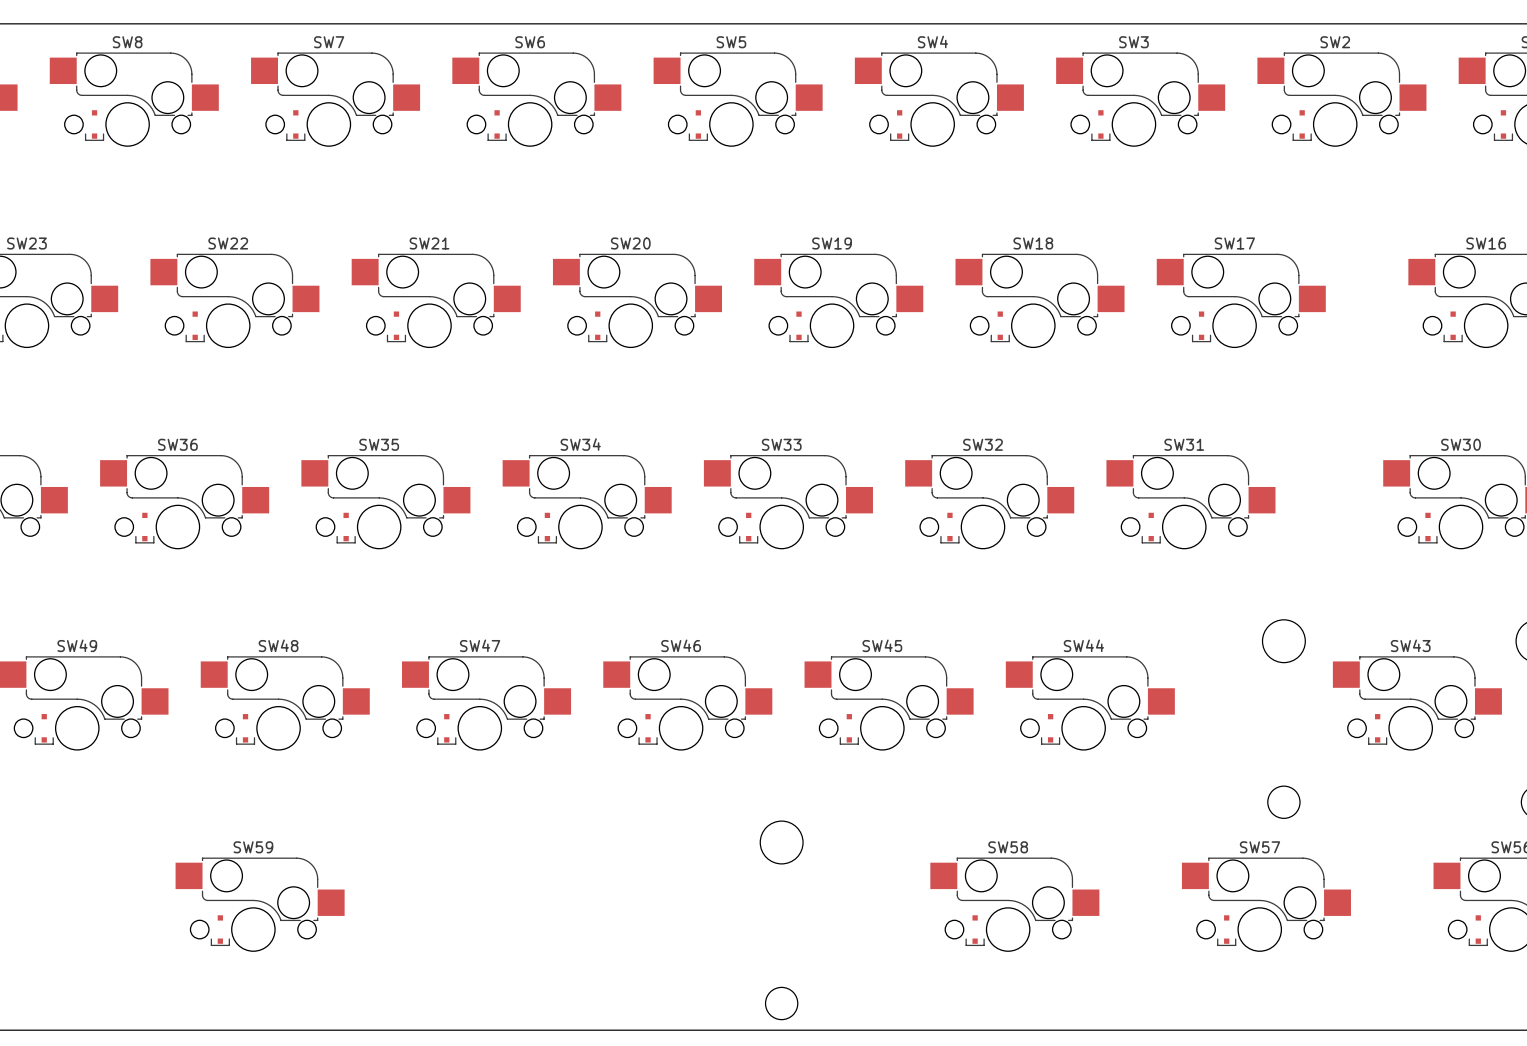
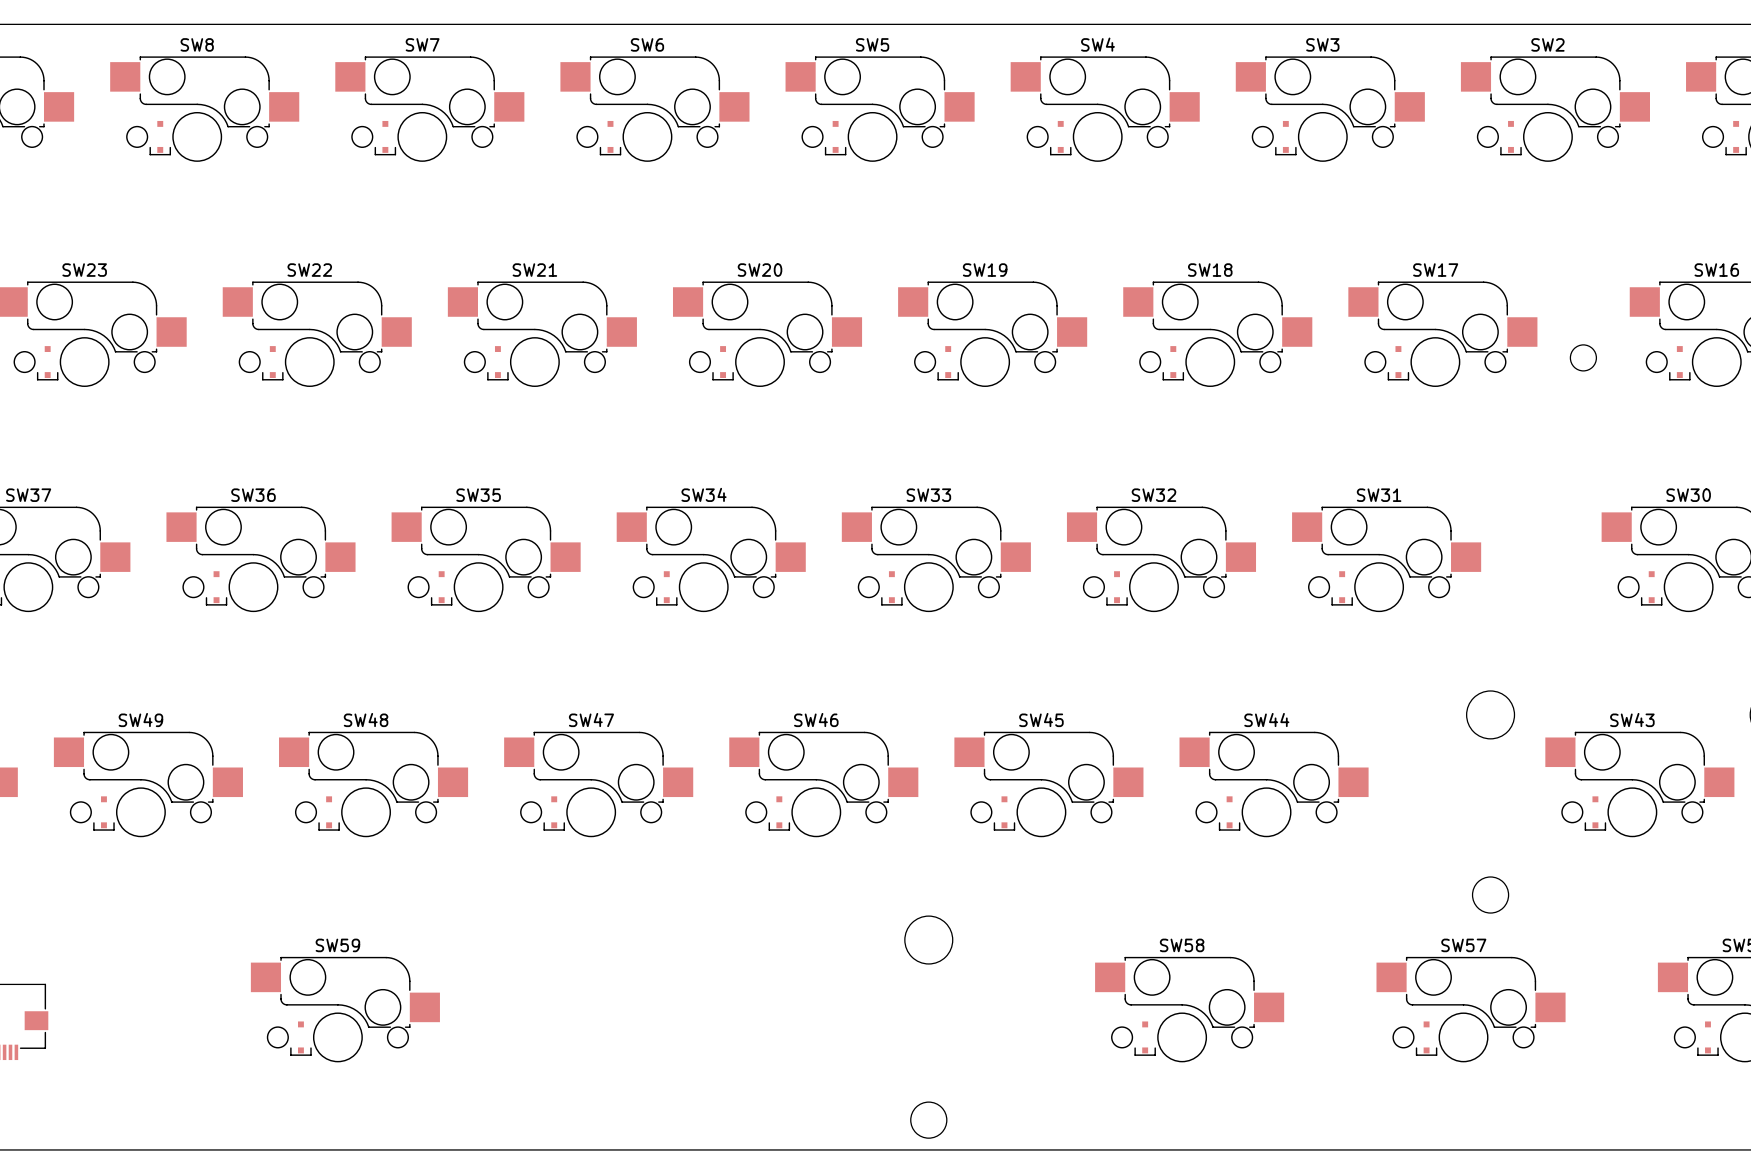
round board edge: none -> [1569, 344, 1597, 372]

